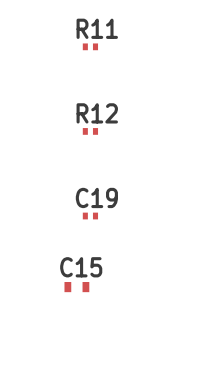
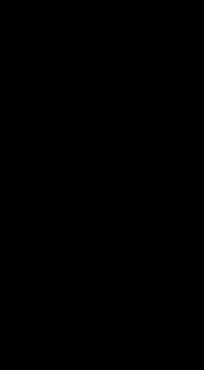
R11: (90, 46) -> none
R12: (90, 131) -> none
C19: (90, 216) -> none
C15: (76, 287) -> none

